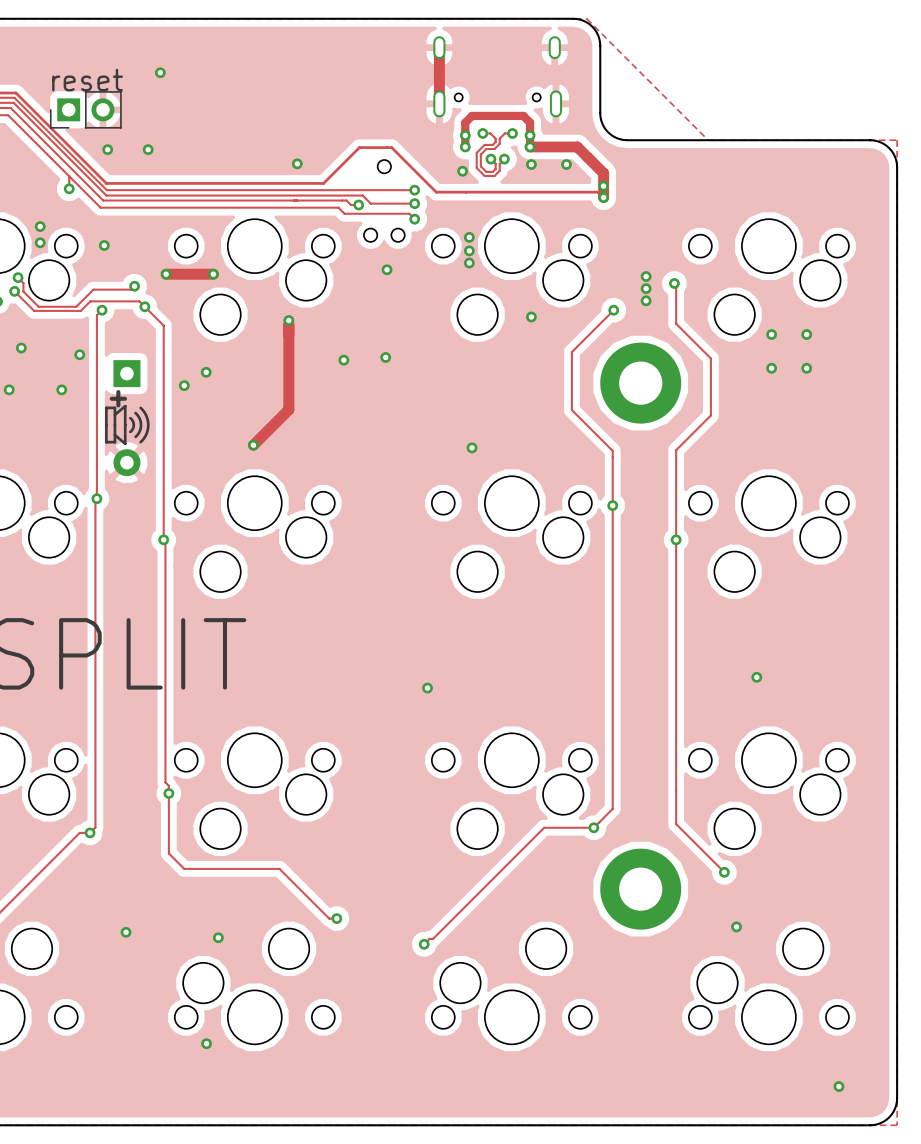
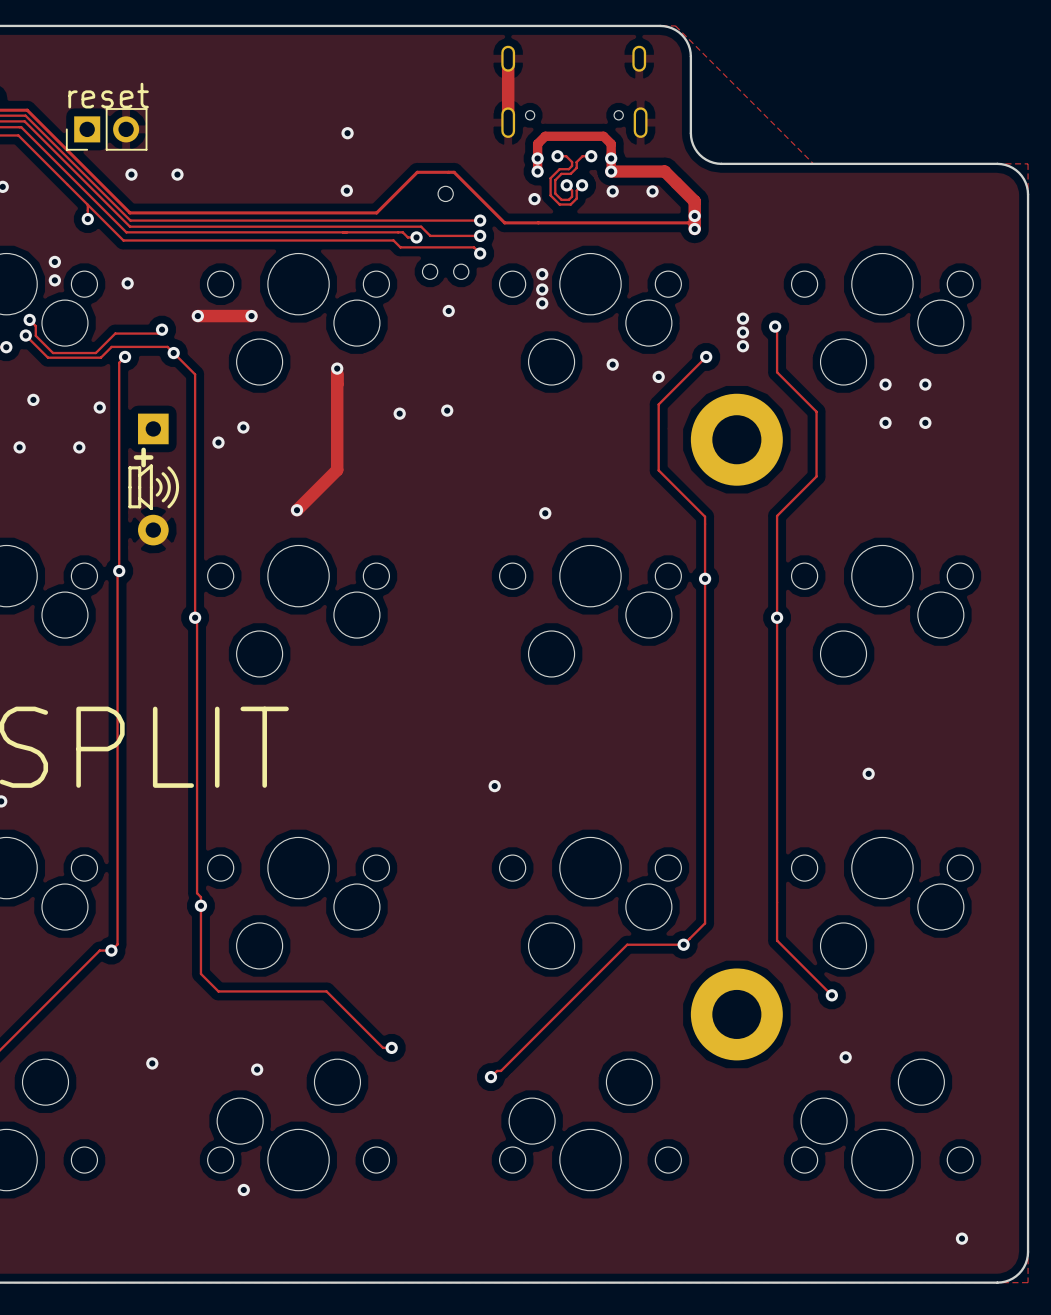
via: (160, 72) -> none
via: none -> (347, 133)
via: none -> (658, 376)

